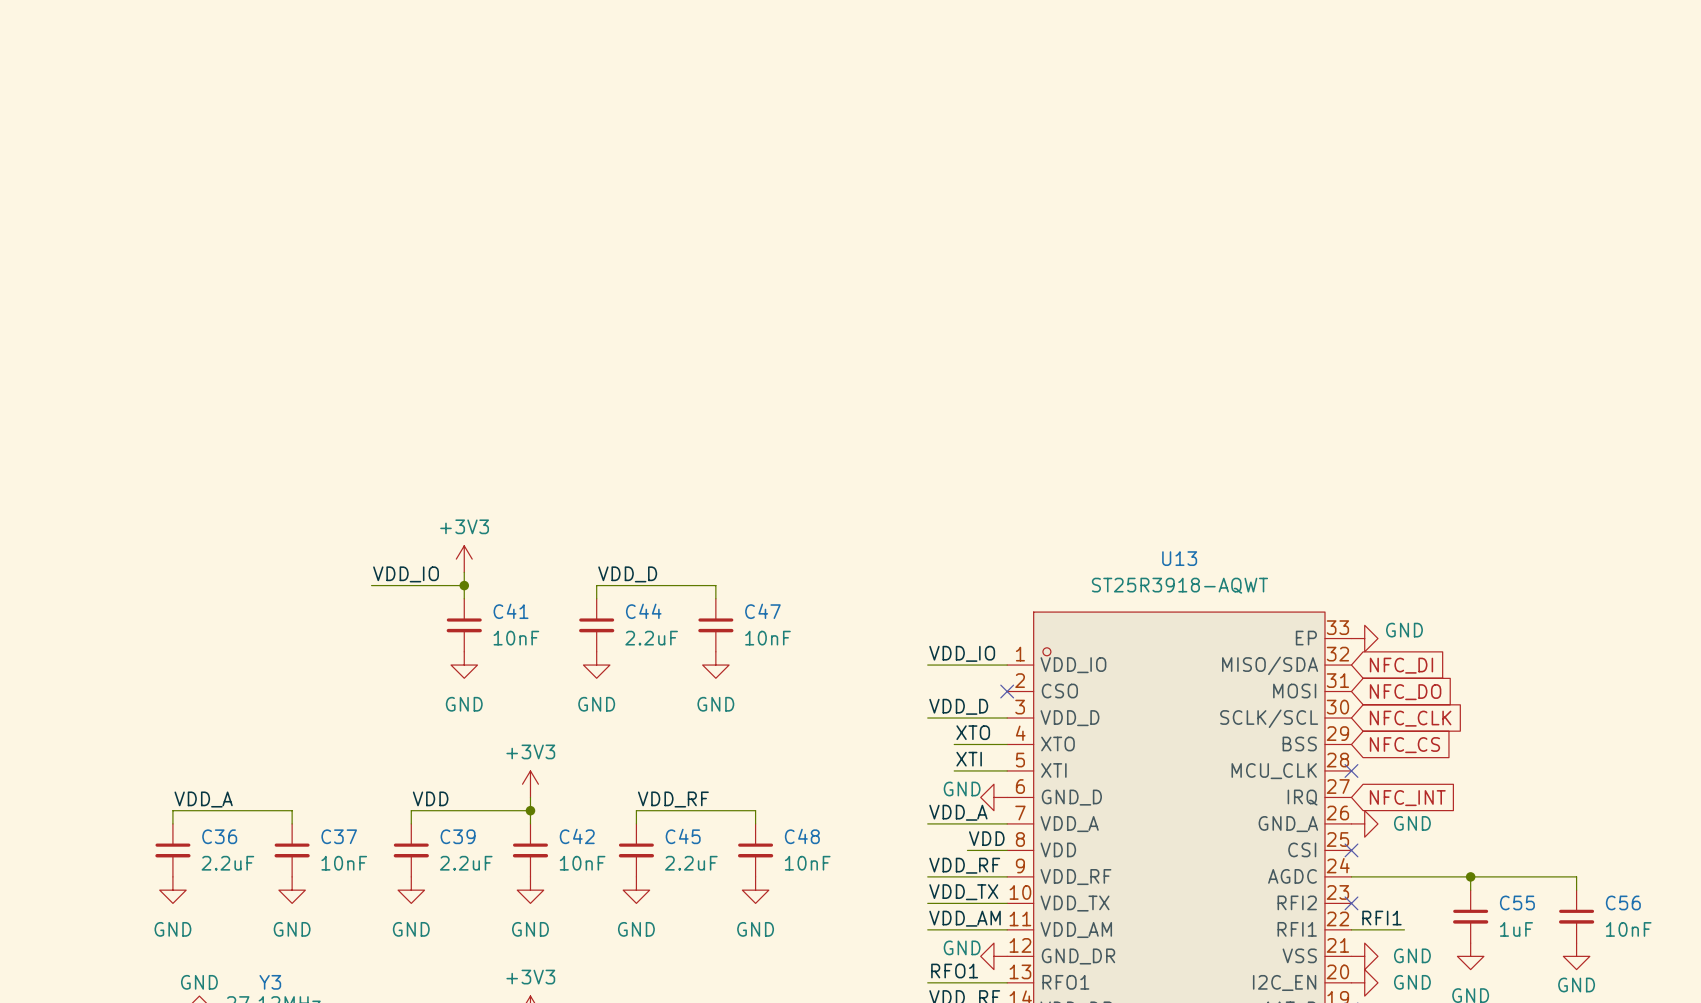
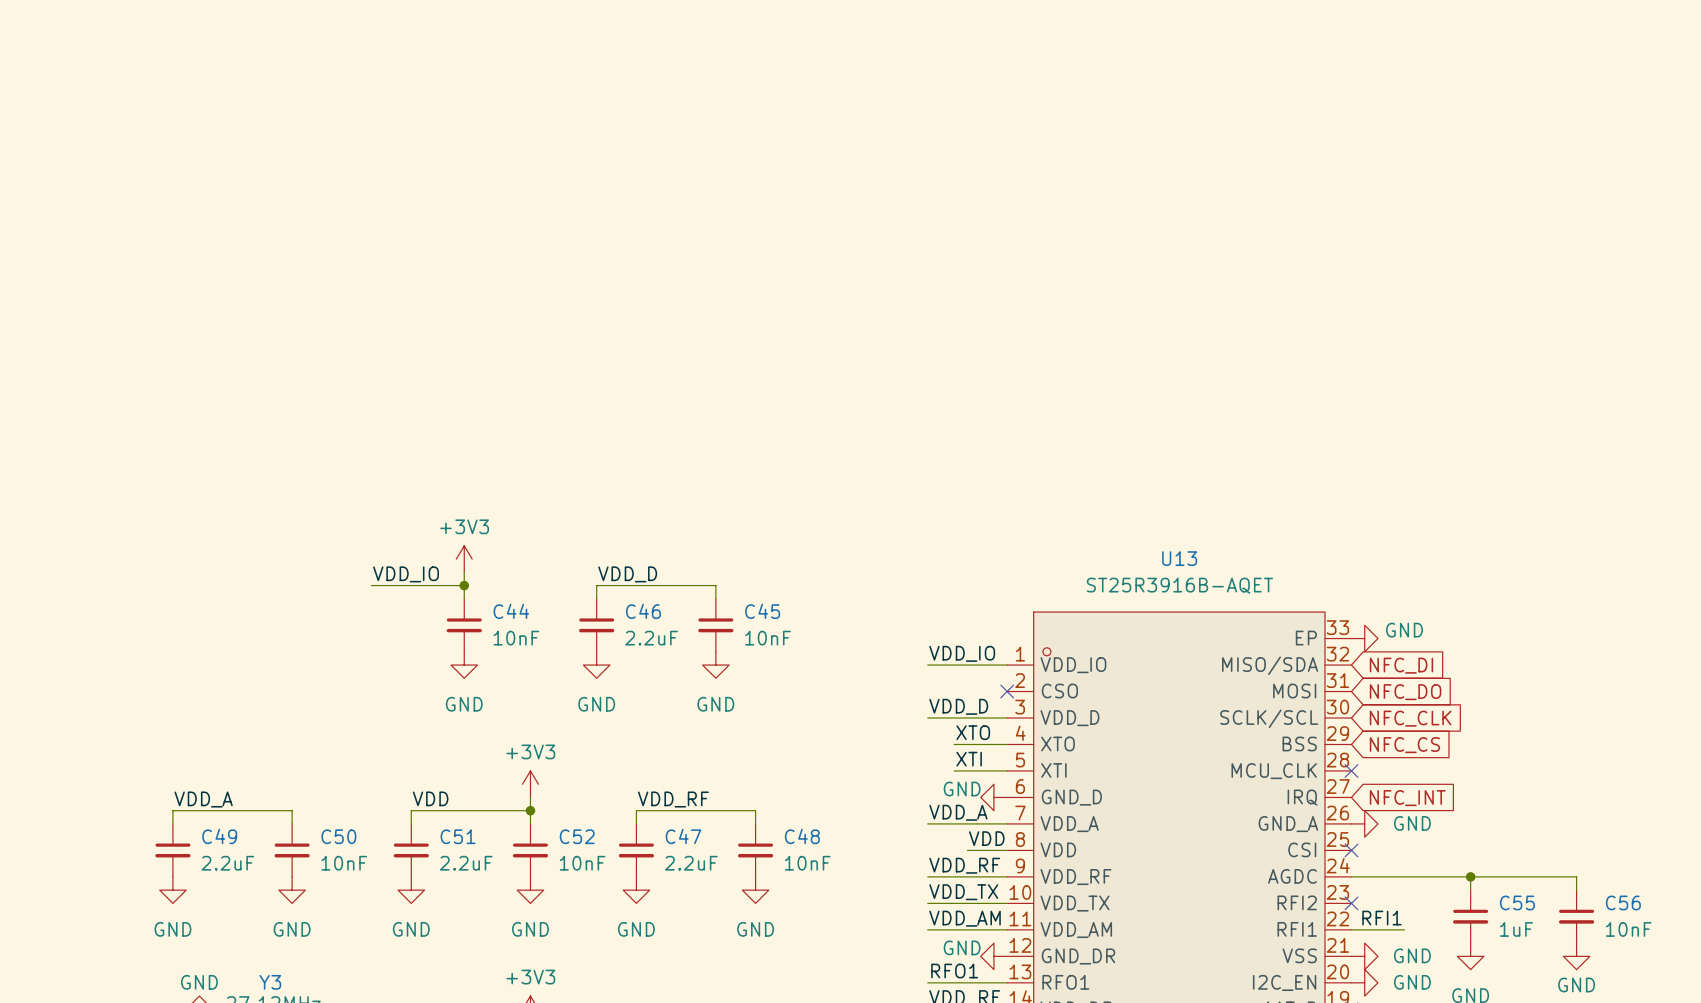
U13 value: ST25R3918-AQWT (1179, 585) -> ST25R3916B-AQET (1179, 585)
C41 name: C41 (511, 611) -> C44 (511, 611)
C44 name: C44 (643, 611) -> C46 (643, 611)
C47 name: C47 (762, 611) -> C45 (762, 611)
C36 name: C36 (219, 836) -> C49 (219, 836)
C37 name: C37 (339, 836) -> C50 (338, 836)
C39 name: C39 (458, 836) -> C51 (458, 836)
C42 name: C42 (577, 836) -> C52 (577, 836)
C45 name: C45 (683, 836) -> C47 (683, 836)

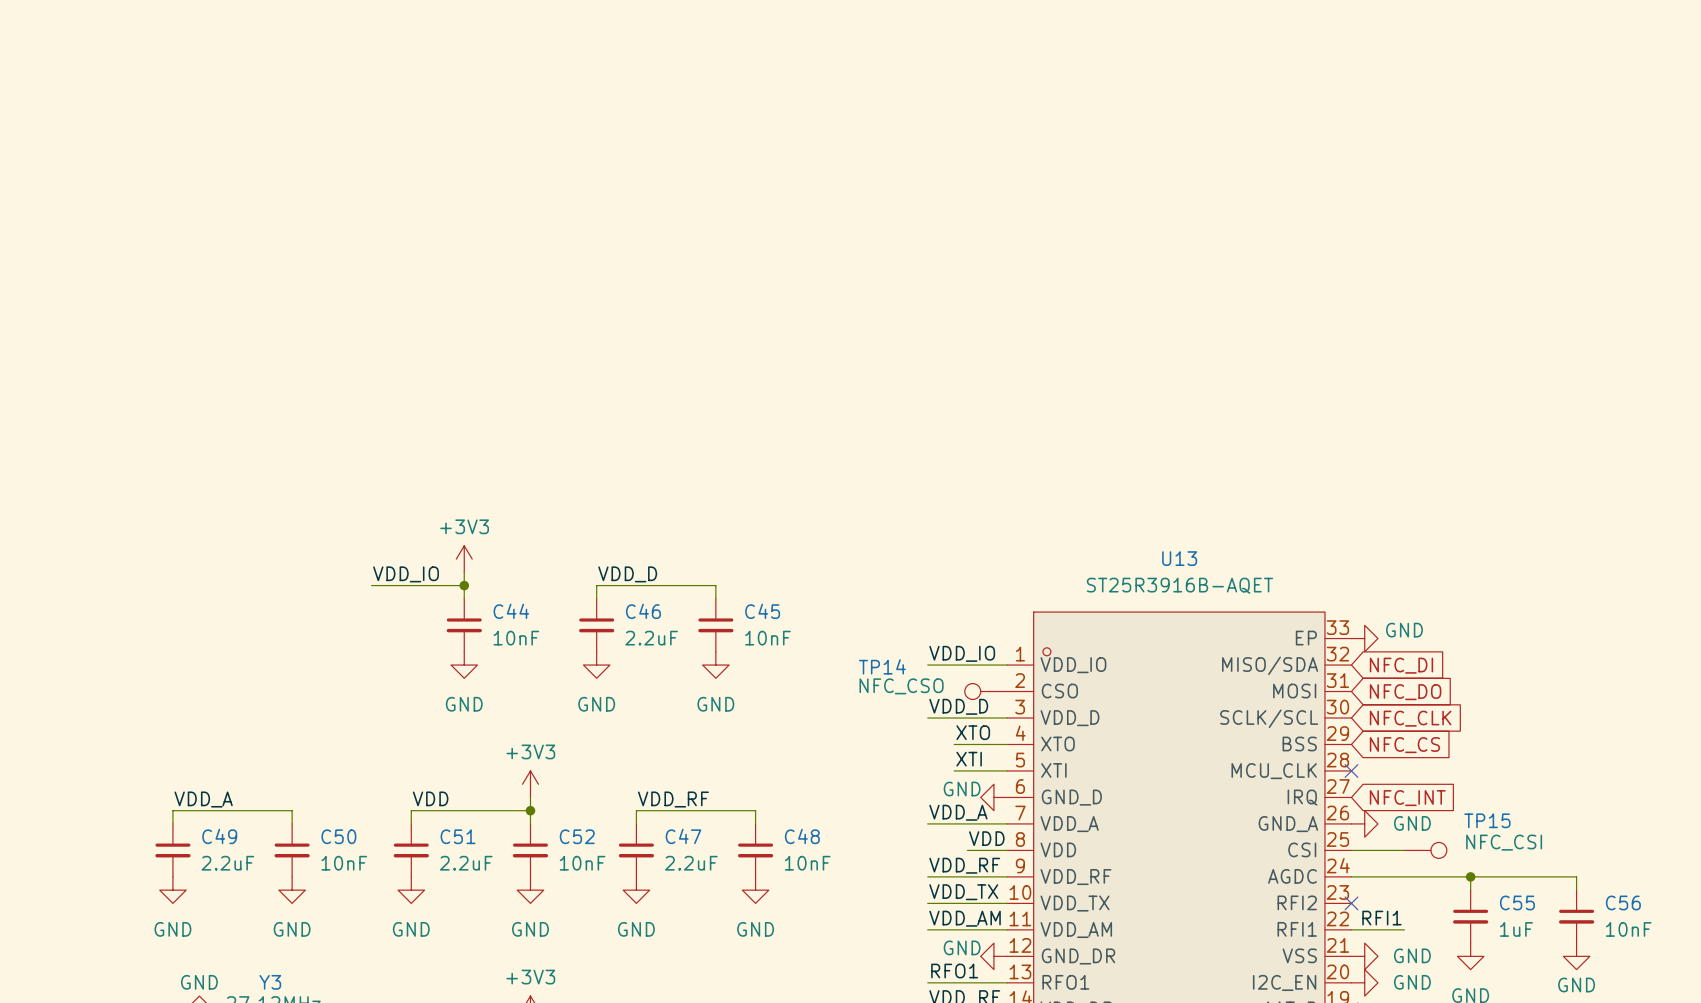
TP14: none -> NFC_CSO (986, 691)
no-connect mark: (1007, 691) -> none
wire: none -> (1351, 850) (1404, 850)
no-connect mark: (1351, 850) -> none
TP15: none -> NFC_CSI (1425, 850)

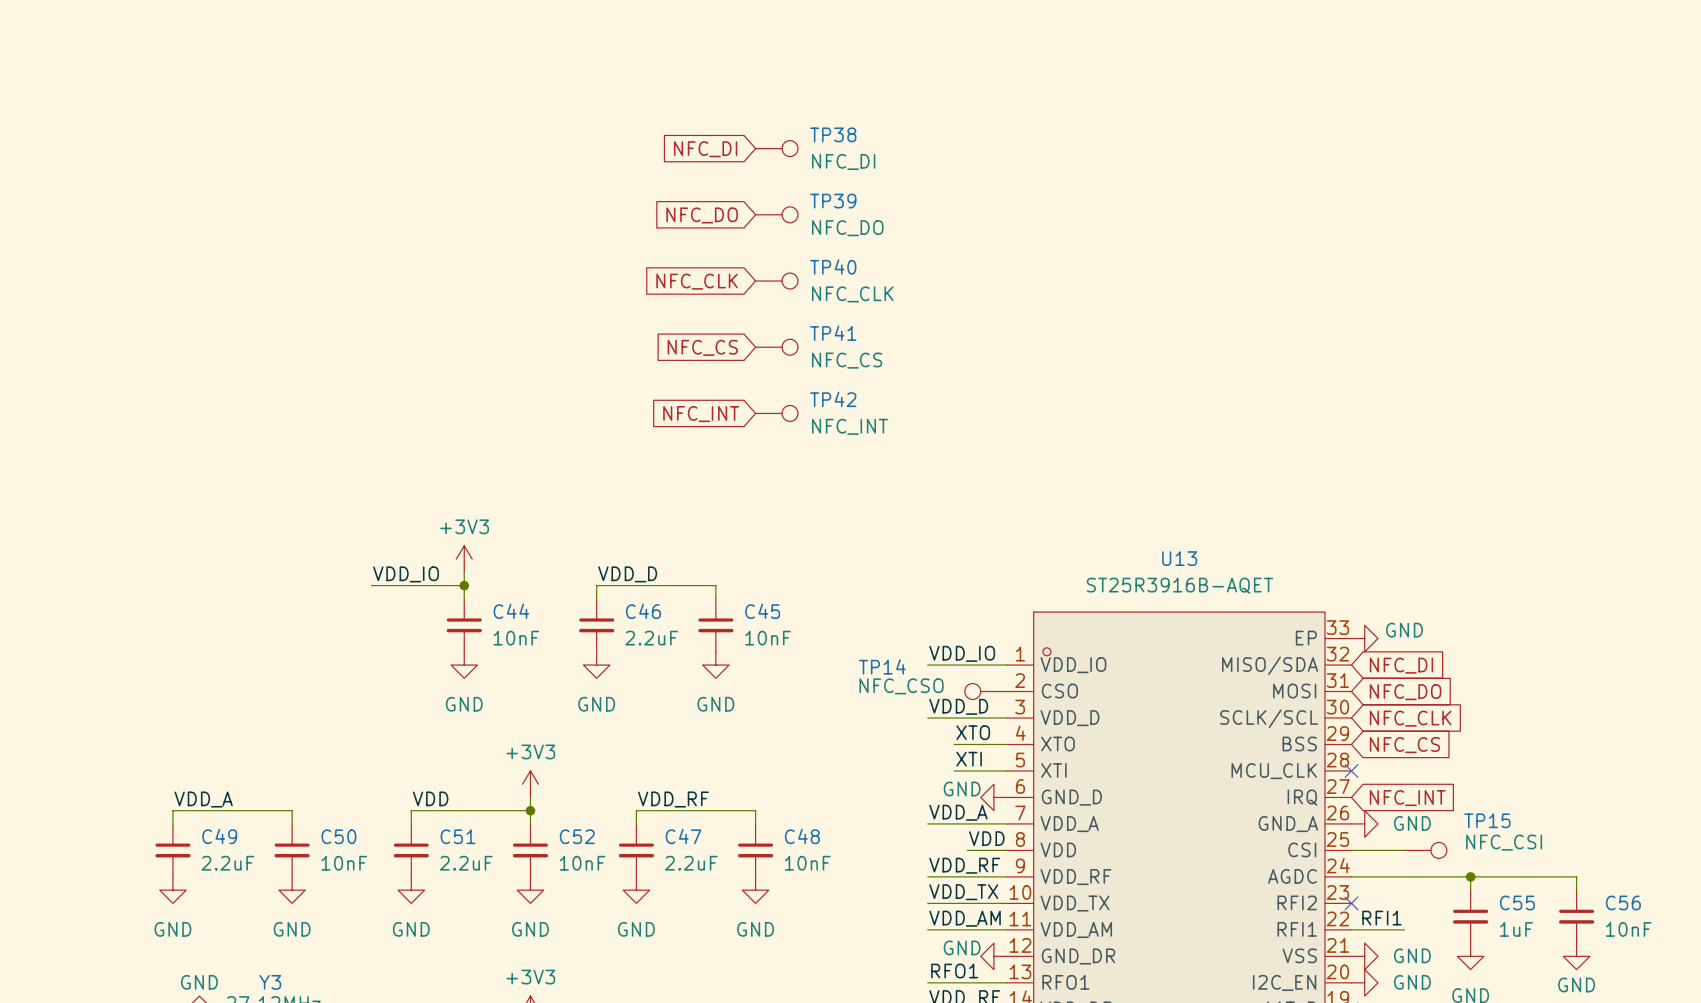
TP38: none -> NFC_DI (776, 148)
global label: none -> NFC_DI (705, 149)
TP39: none -> NFC_DO (776, 214)
global label: none -> NFC_DO (702, 215)
global label: none -> NFC_CLK (697, 281)
TP40: none -> NFC_CLK (776, 281)
global label: none -> NFC_CS (702, 347)
TP41: none -> NFC_CS (776, 347)
TP42: none -> NFC_INT (776, 413)
global label: none -> NFC_INT (701, 414)

